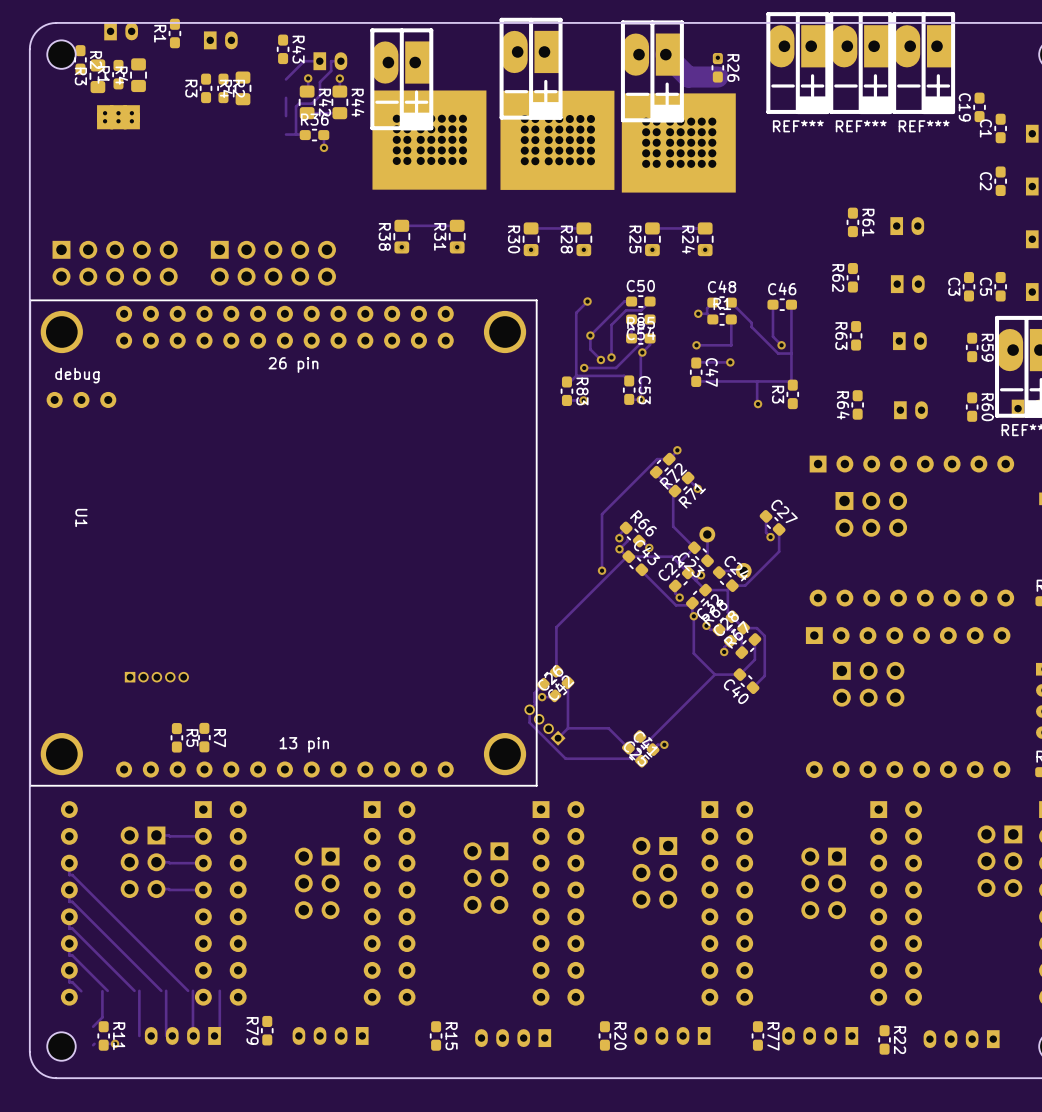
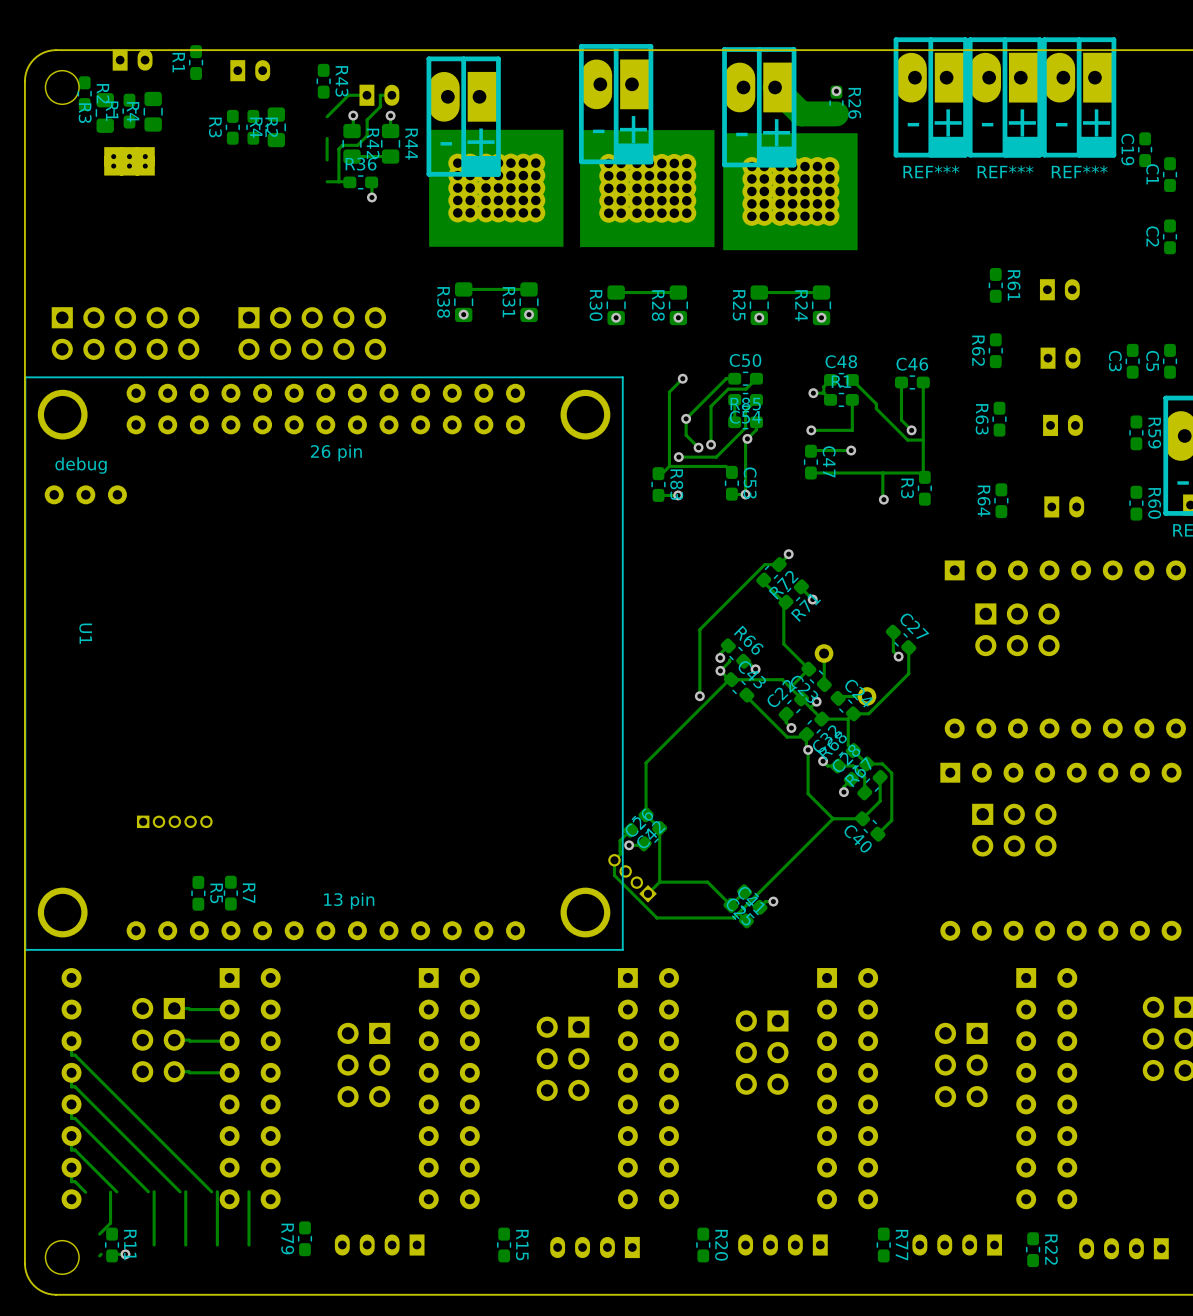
part: (182, 1035) -> none

